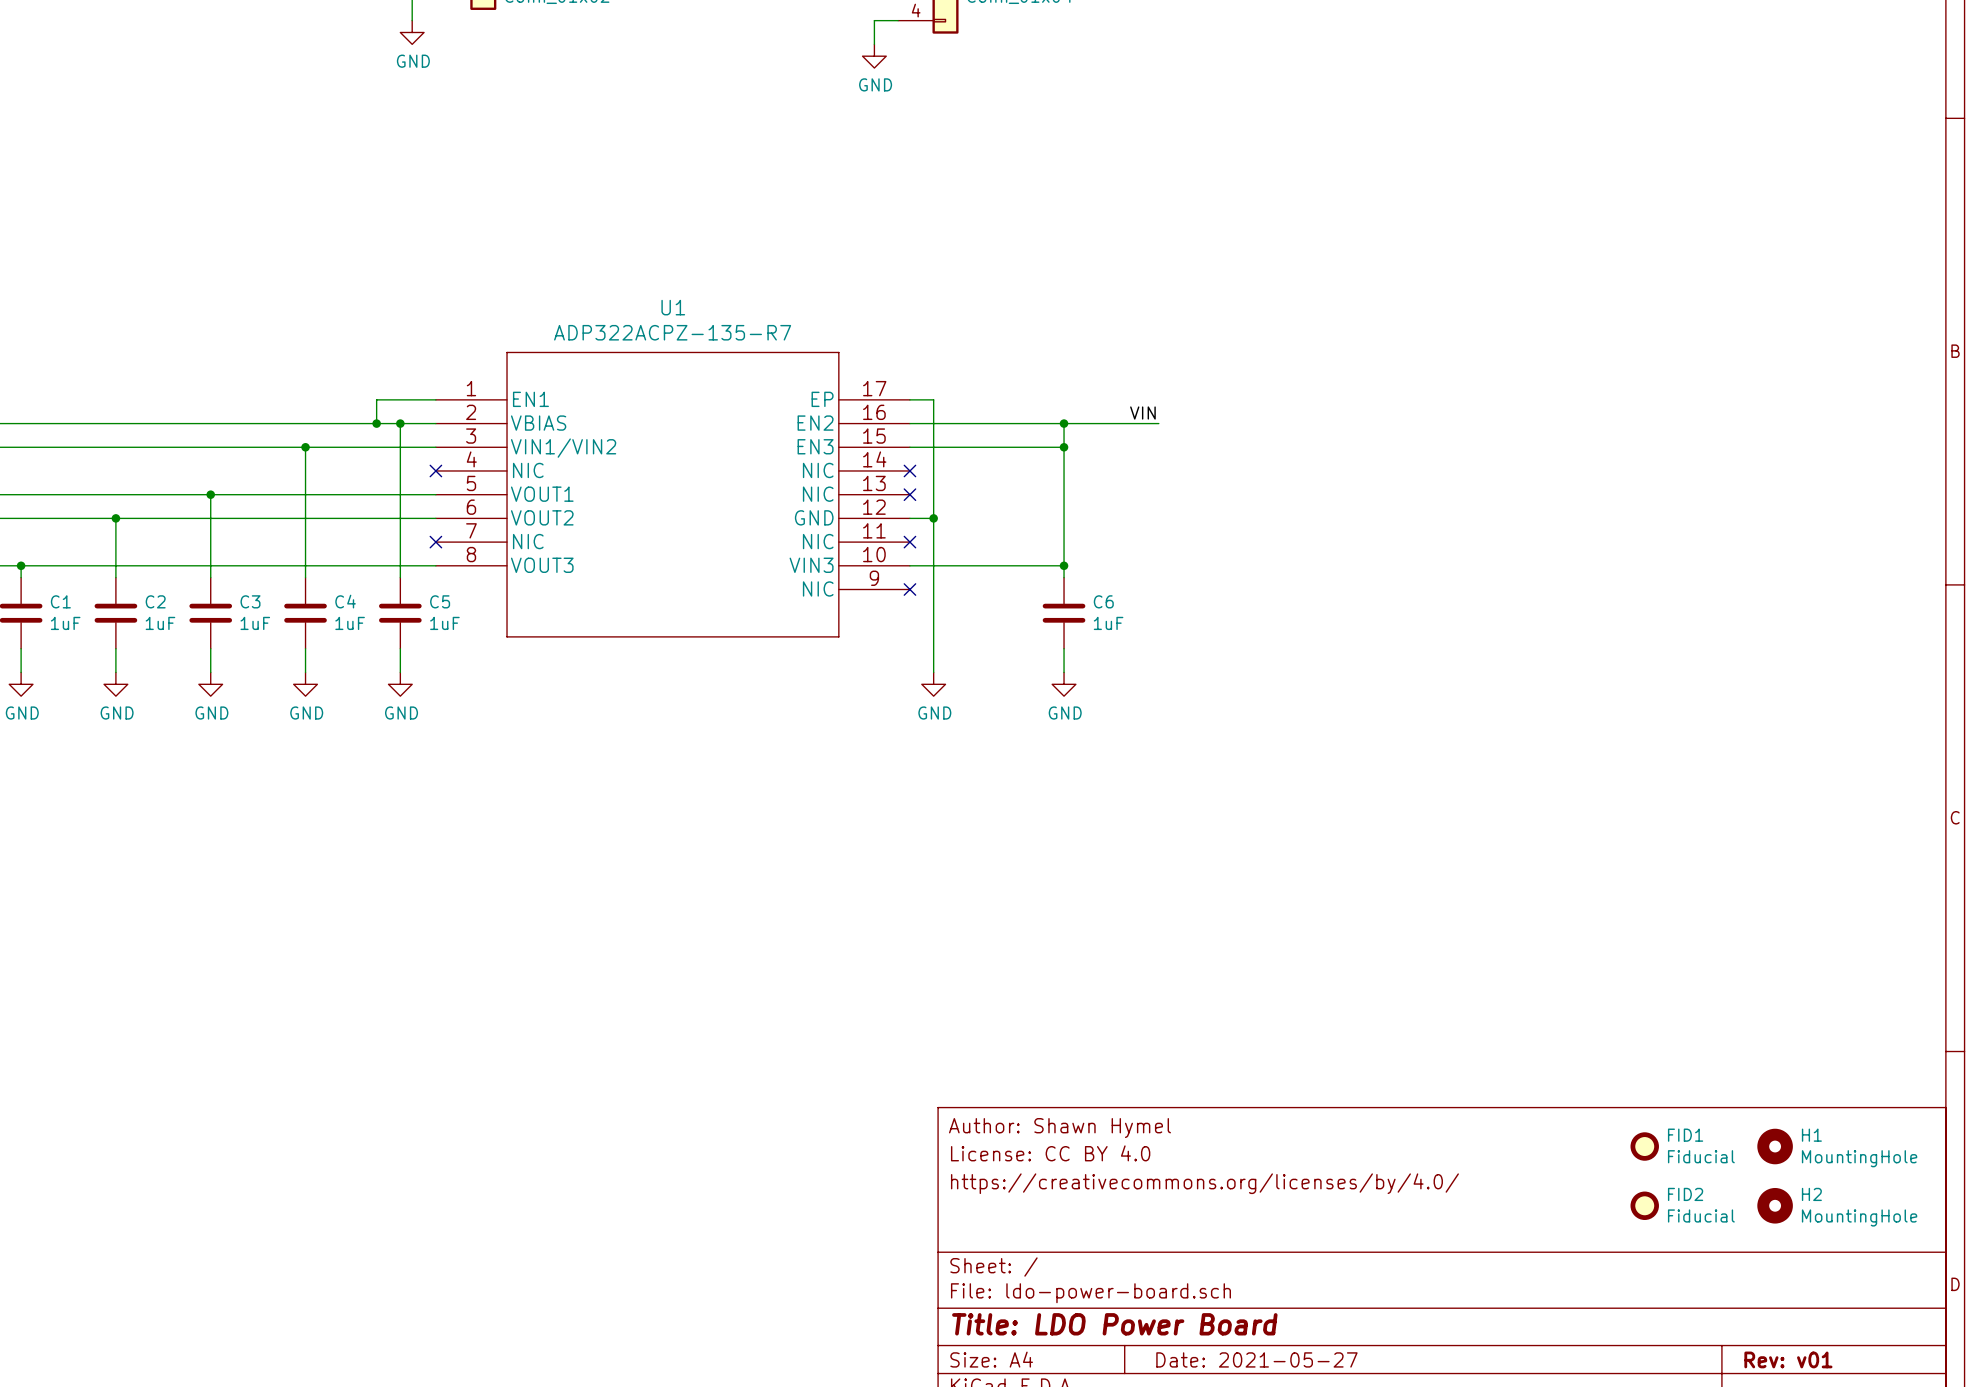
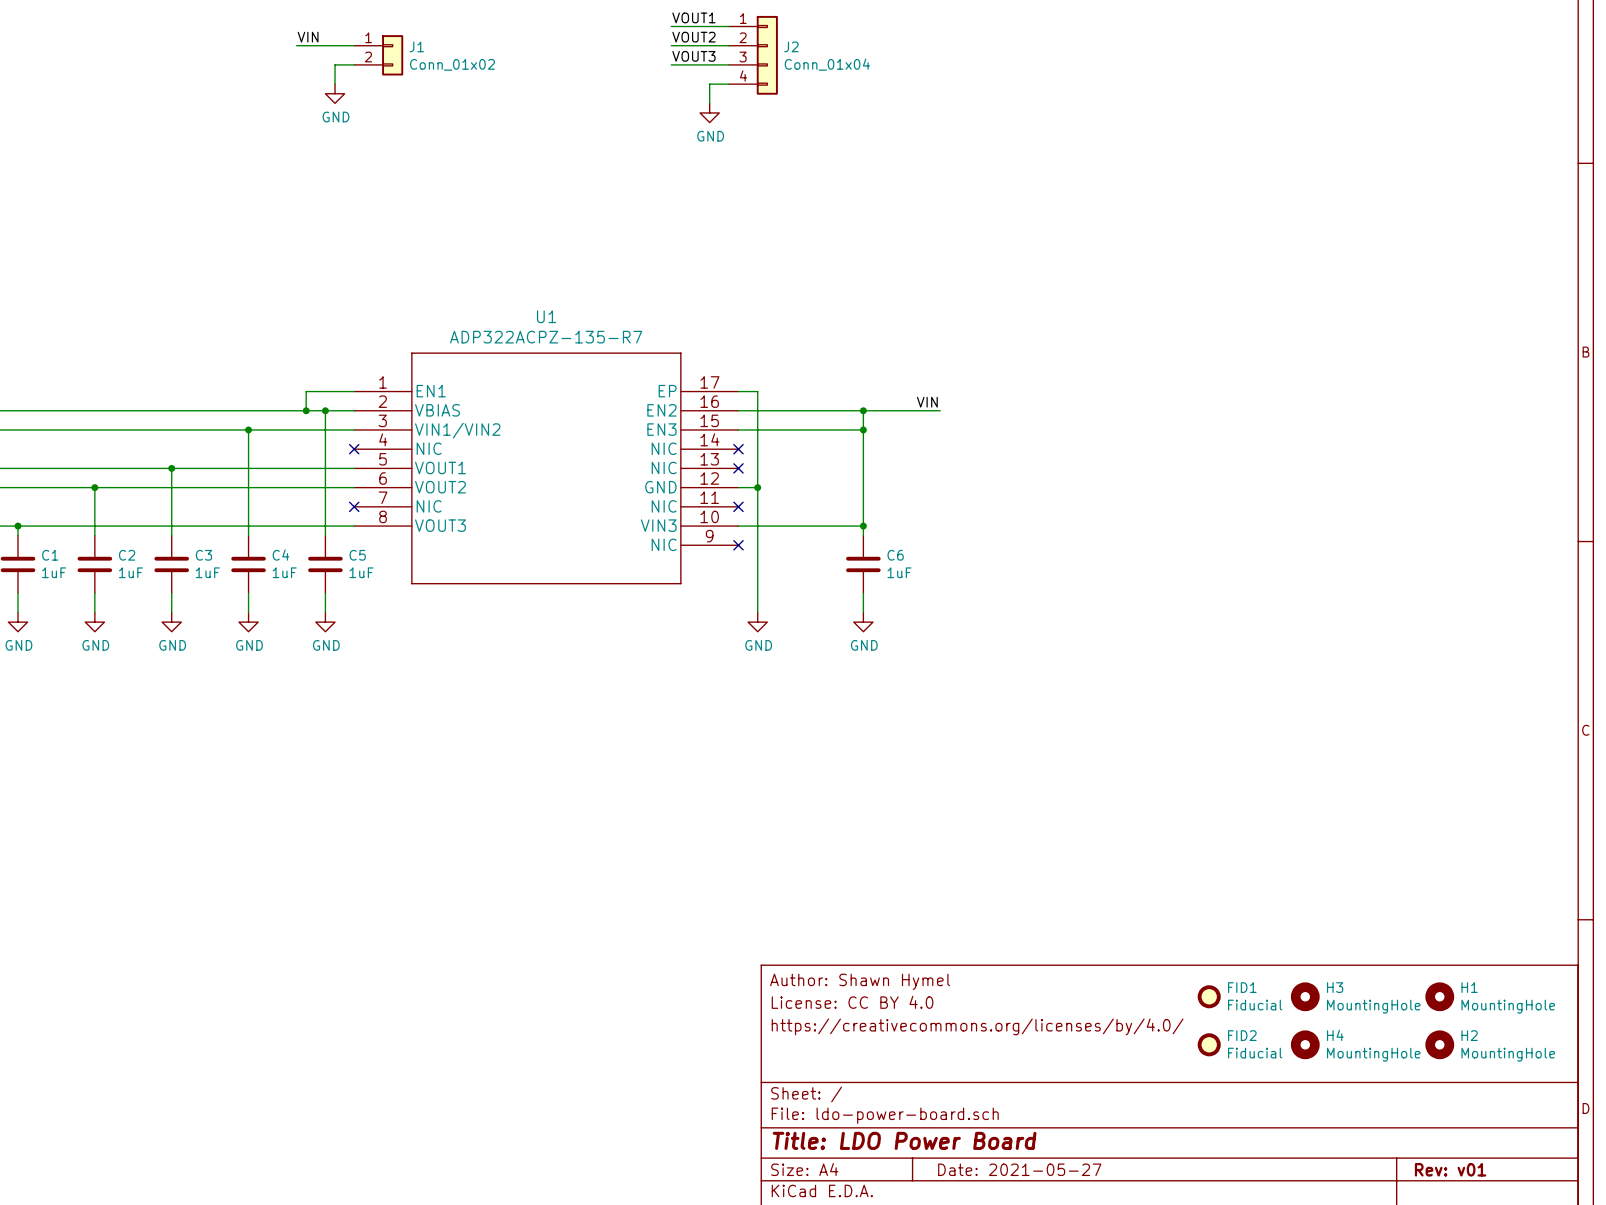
H3: none -> MountingHole (1305, 996)
FID1 position: (1644, 1146) -> (1209, 996)
H4: none -> MountingHole (1305, 1044)
FID2 position: (1644, 1205) -> (1209, 1044)

